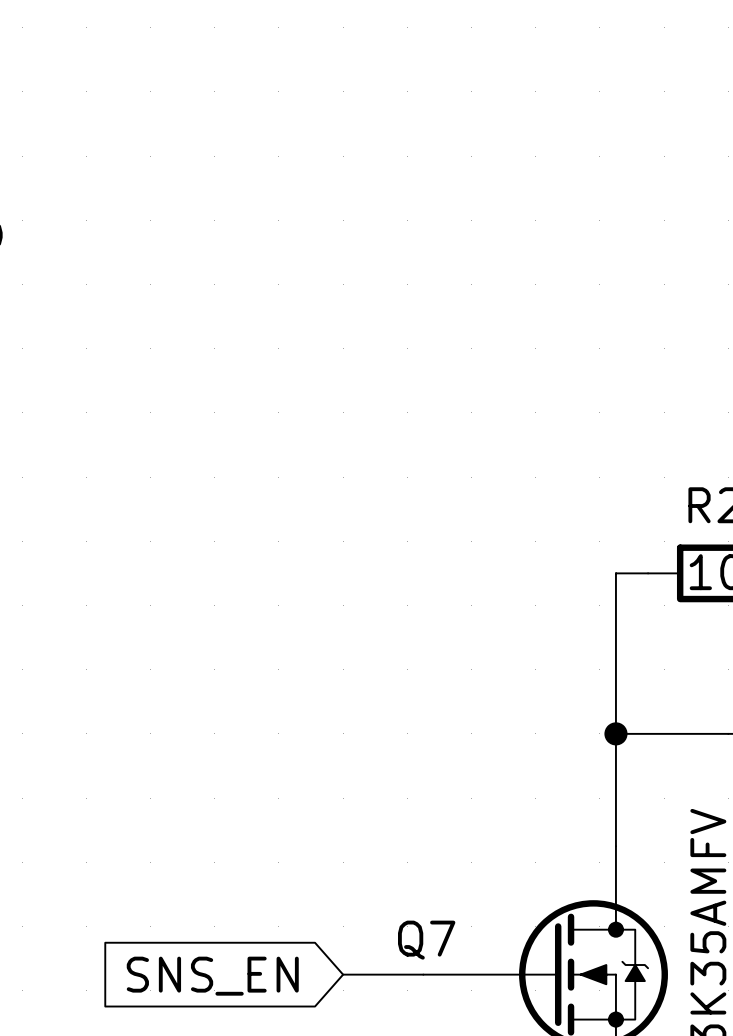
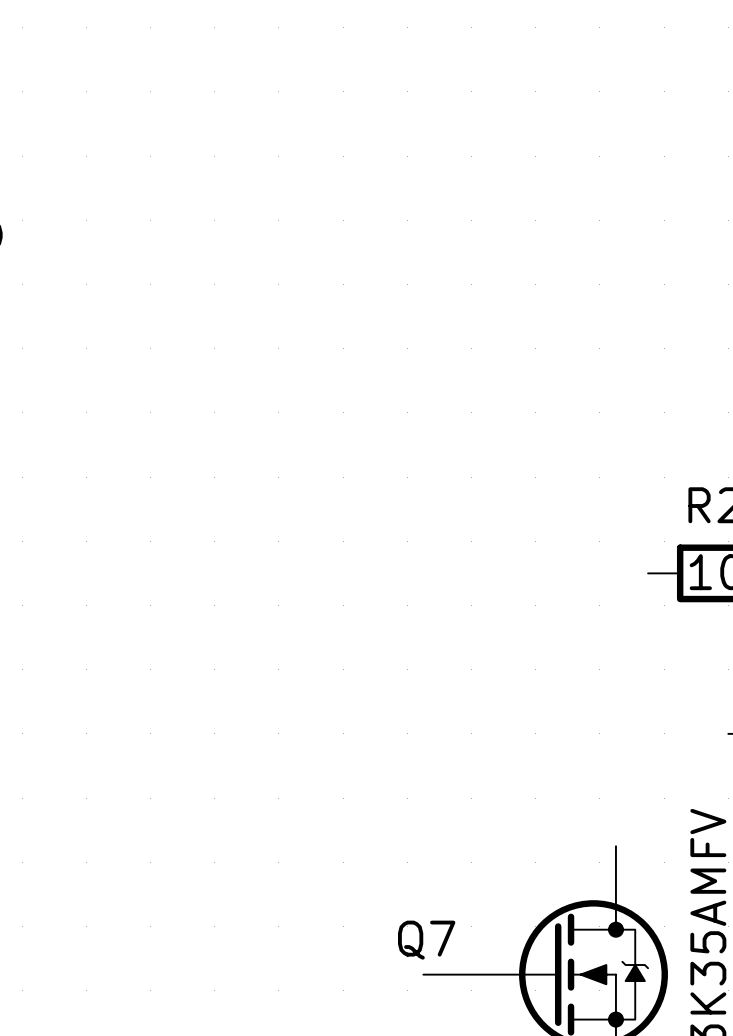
wire: (648, 573) (615, 573) (615, 846) -> none
wire: (615, 733) (728, 733) -> none
junction: (615, 733) -> none
wire: (343, 974) (423, 974) -> none
global label: SNS_EN (212, 976) -> none

